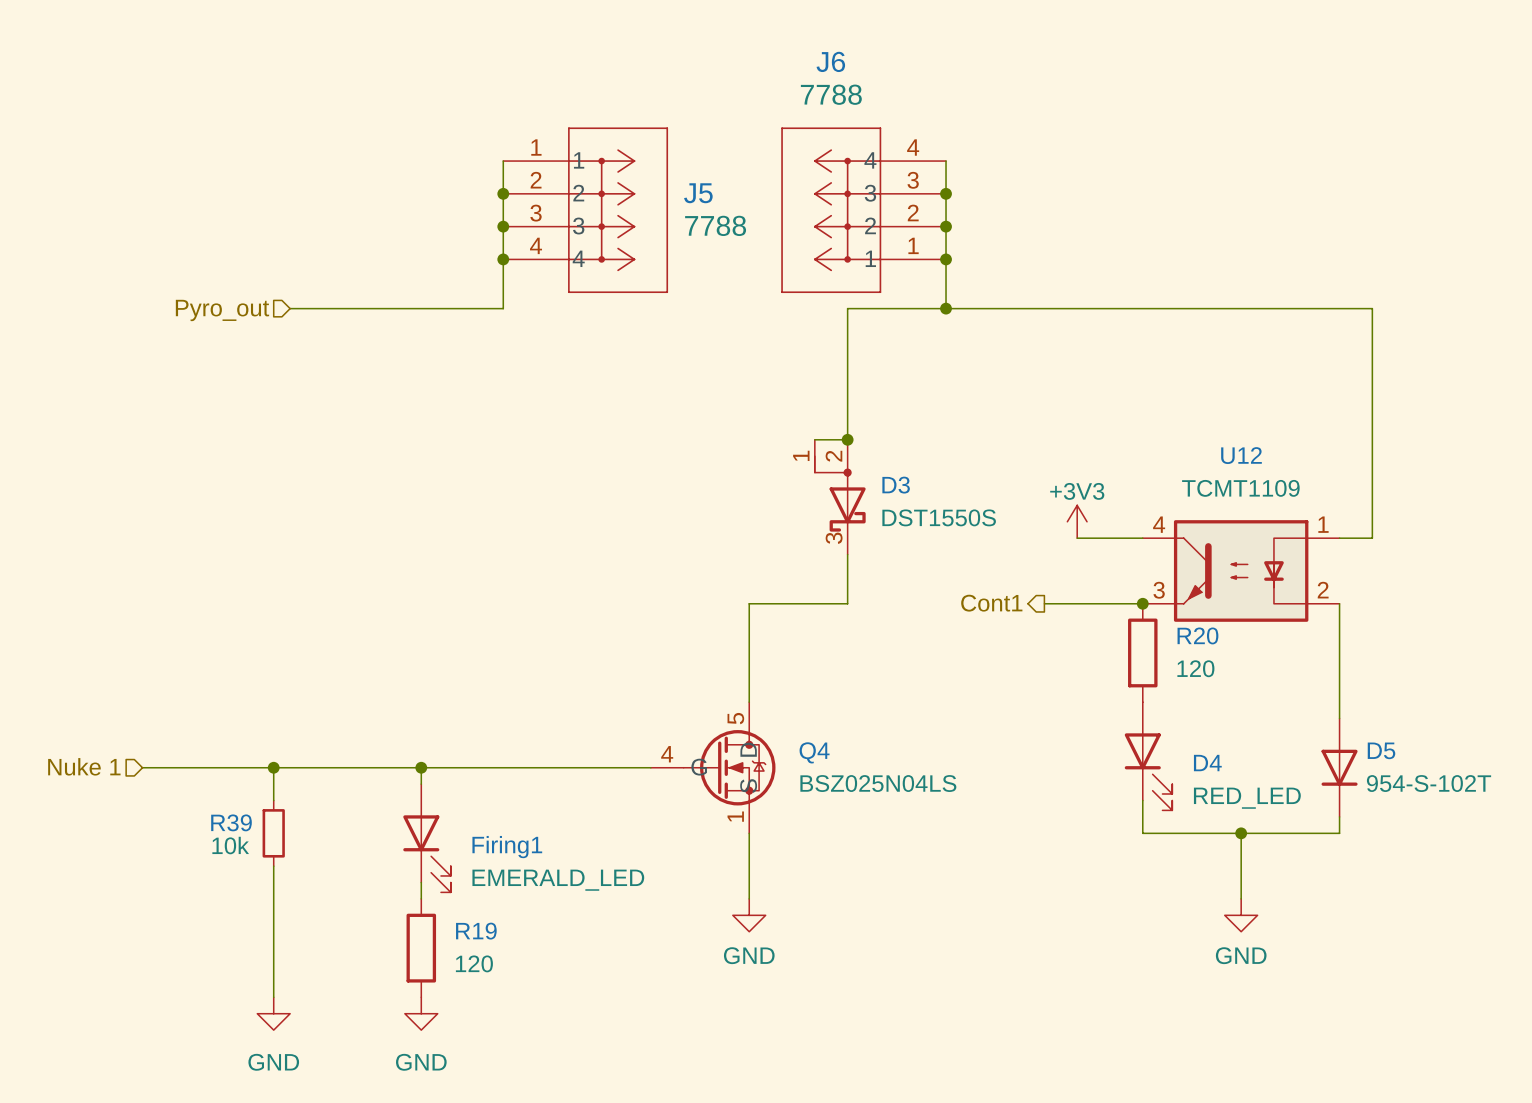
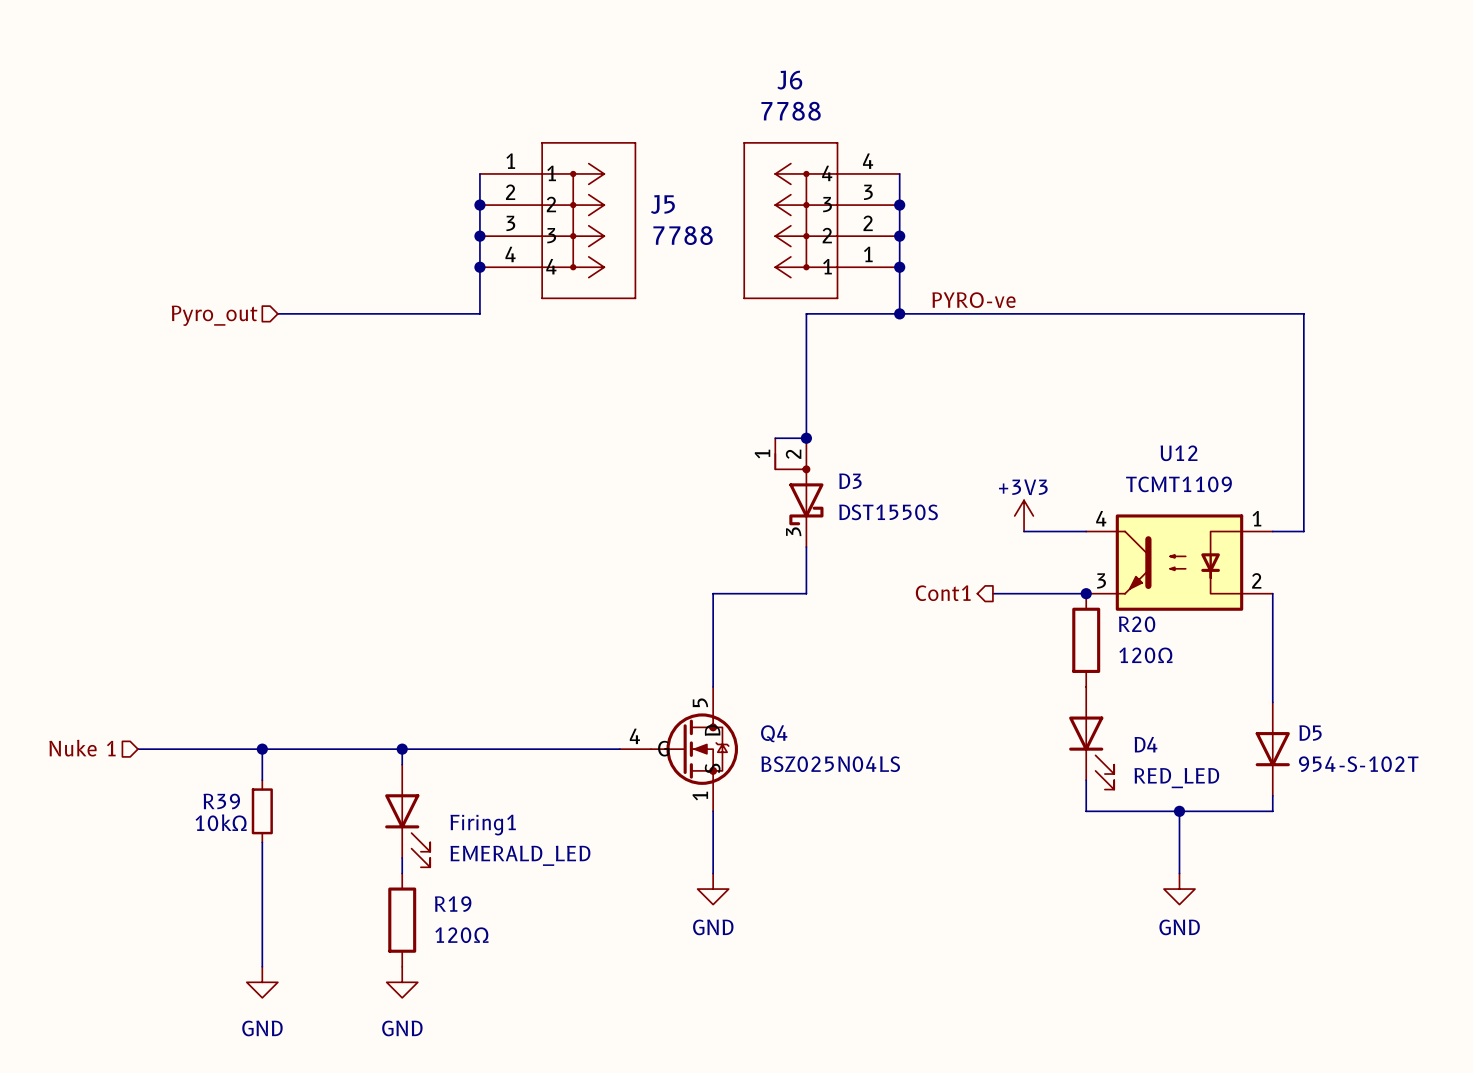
label: none -> PYRO-ve (973, 300)
R20 value: 120 (1195, 668) -> 120Ω (1145, 655)
R39 value: 10k (230, 845) -> 10kΩ (221, 822)
R19 value: 120 (474, 963) -> 120Ω (461, 935)

